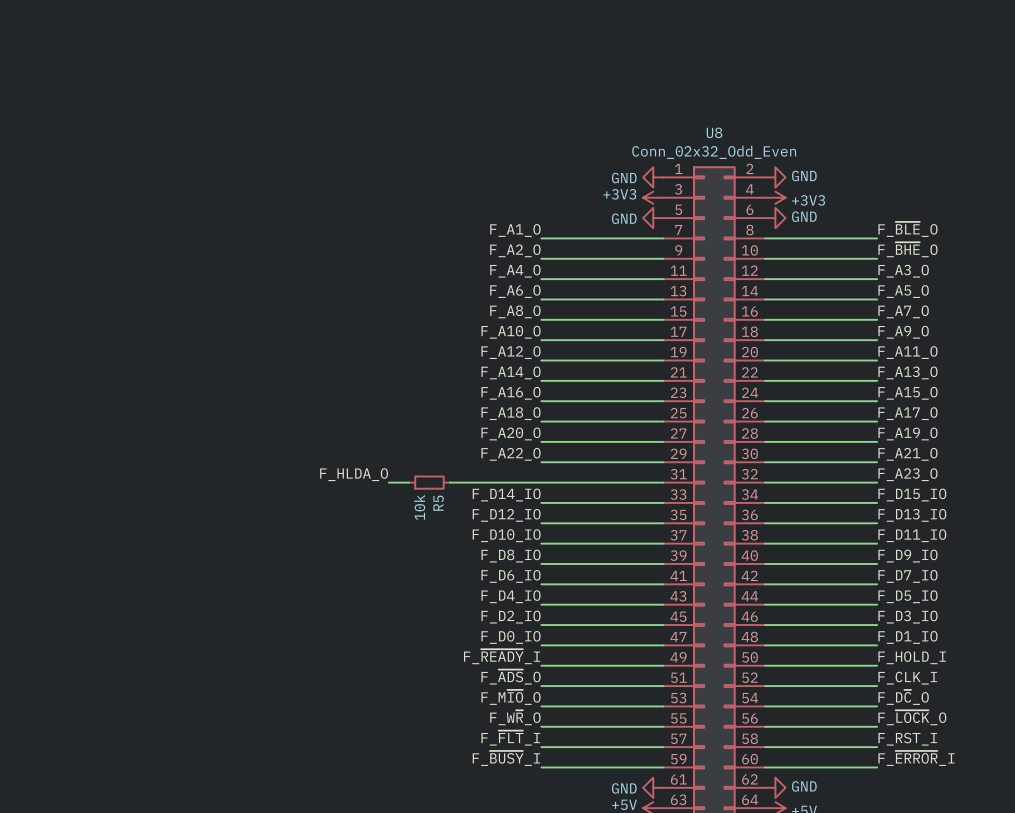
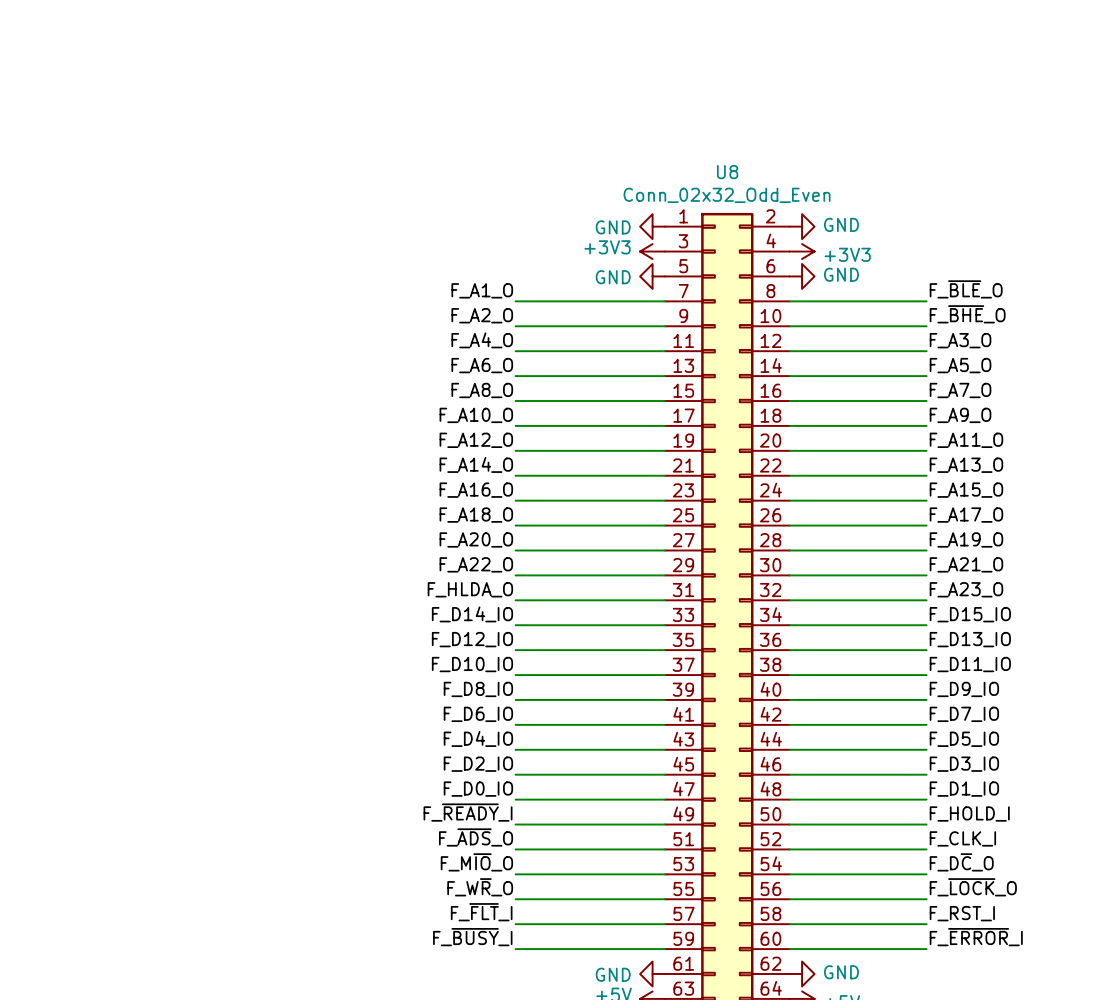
label position: F_HLDA_O (354, 474) -> F_HLDA_O (470, 589)
wire: (388, 482) (409, 482) -> none
R5: 10k (429, 482) -> none
wire: (449, 482) (541, 482) -> none

